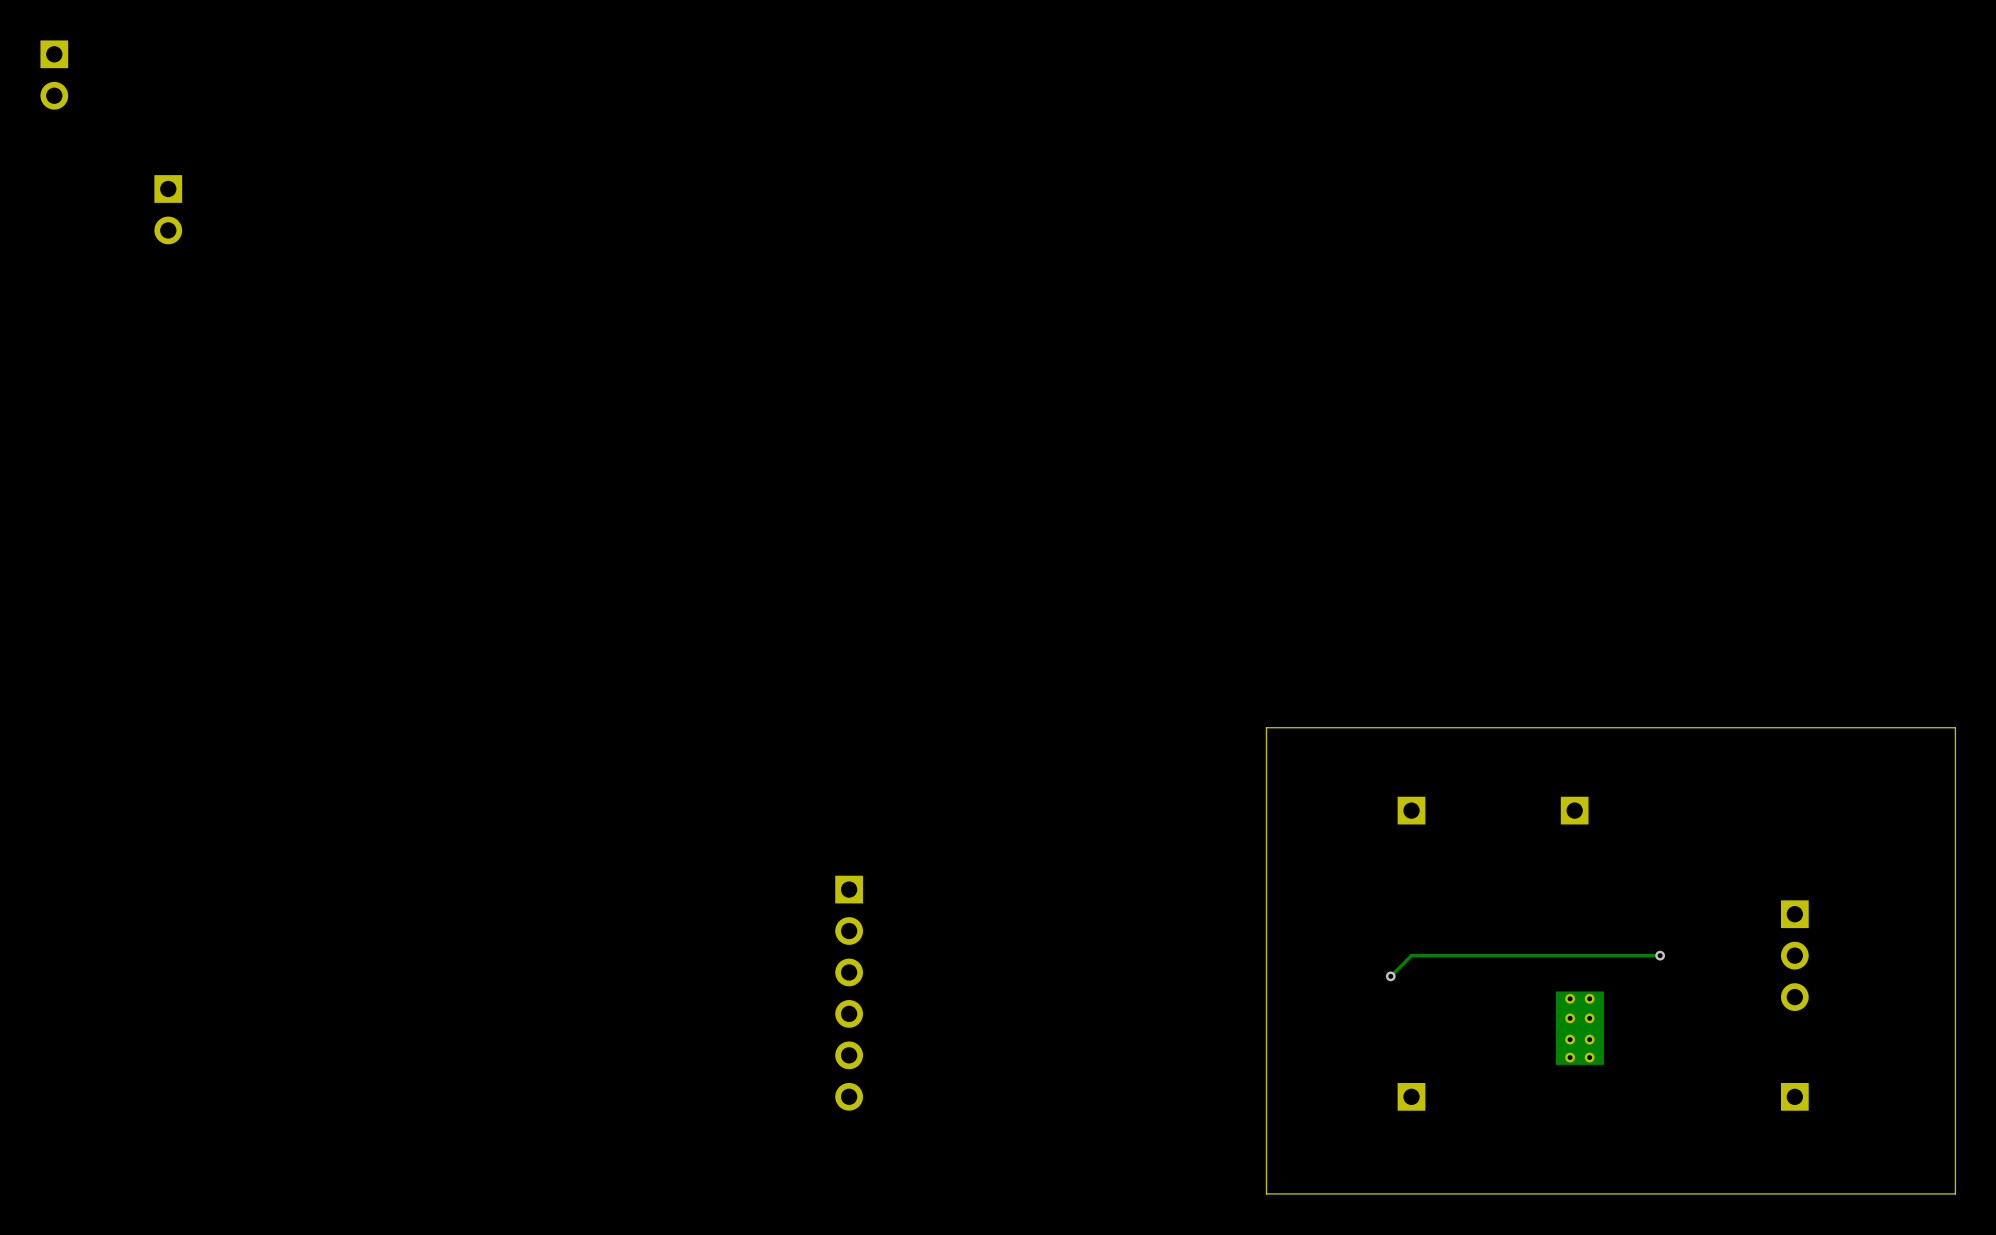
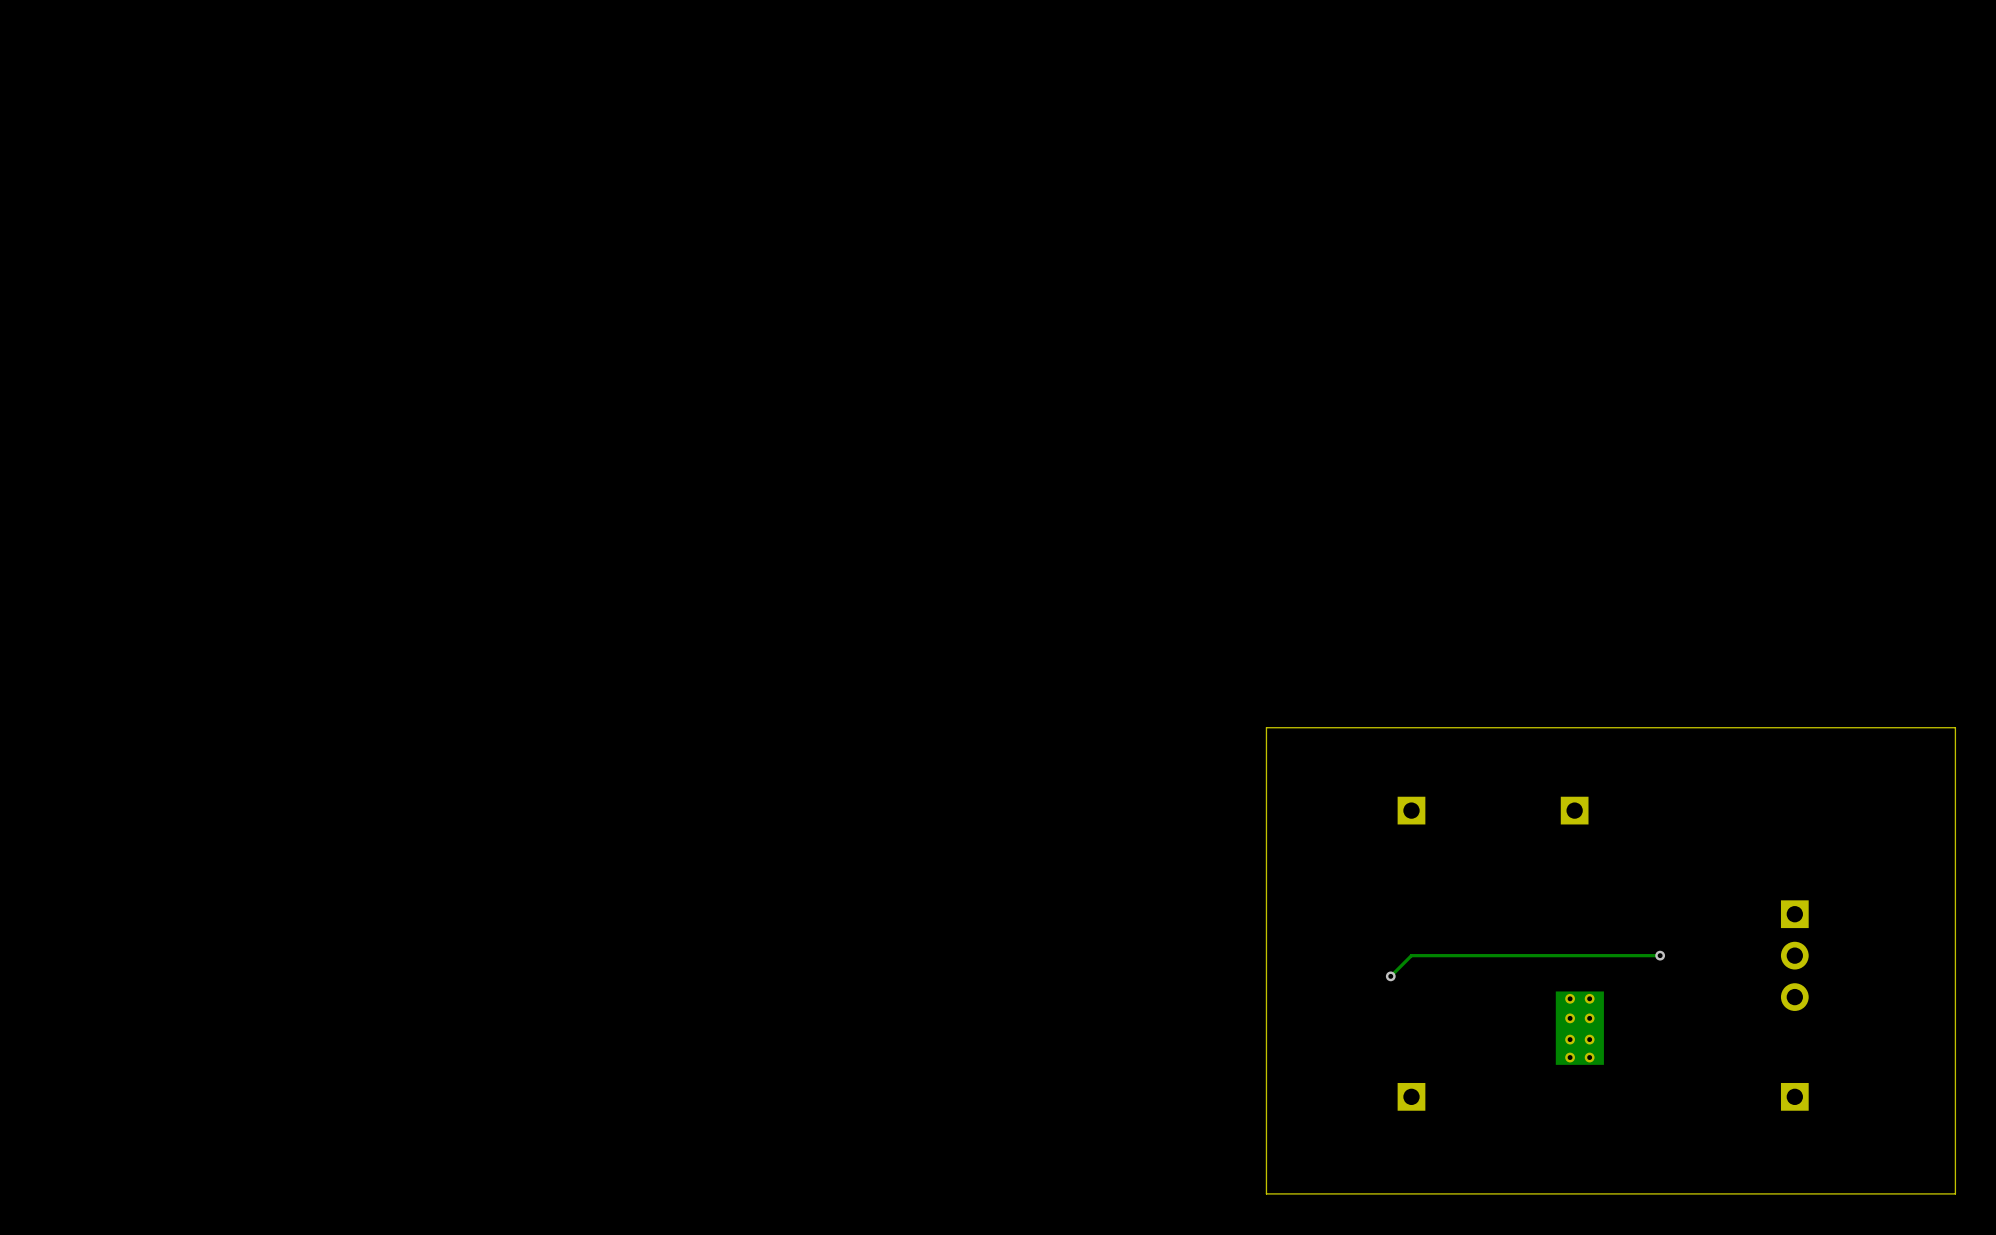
part: (54, 75) -> none
part: (168, 209) -> none
part: (849, 993) -> none

